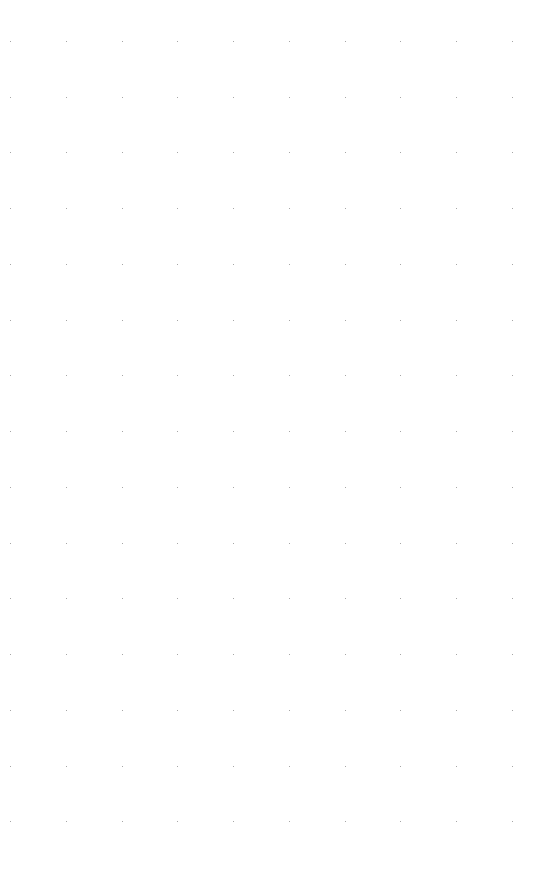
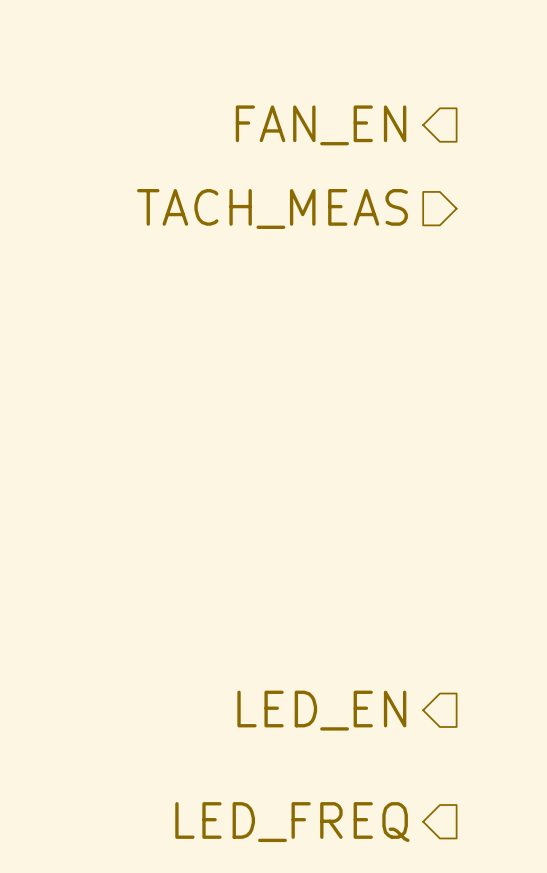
hierarchical label: none -> FAN_EN (321, 125)
hierarchical label: none -> TACH_MEAS (272, 208)
hierarchical label: none -> LED_EN (321, 710)
hierarchical label: none -> LED_FREQ (292, 822)

